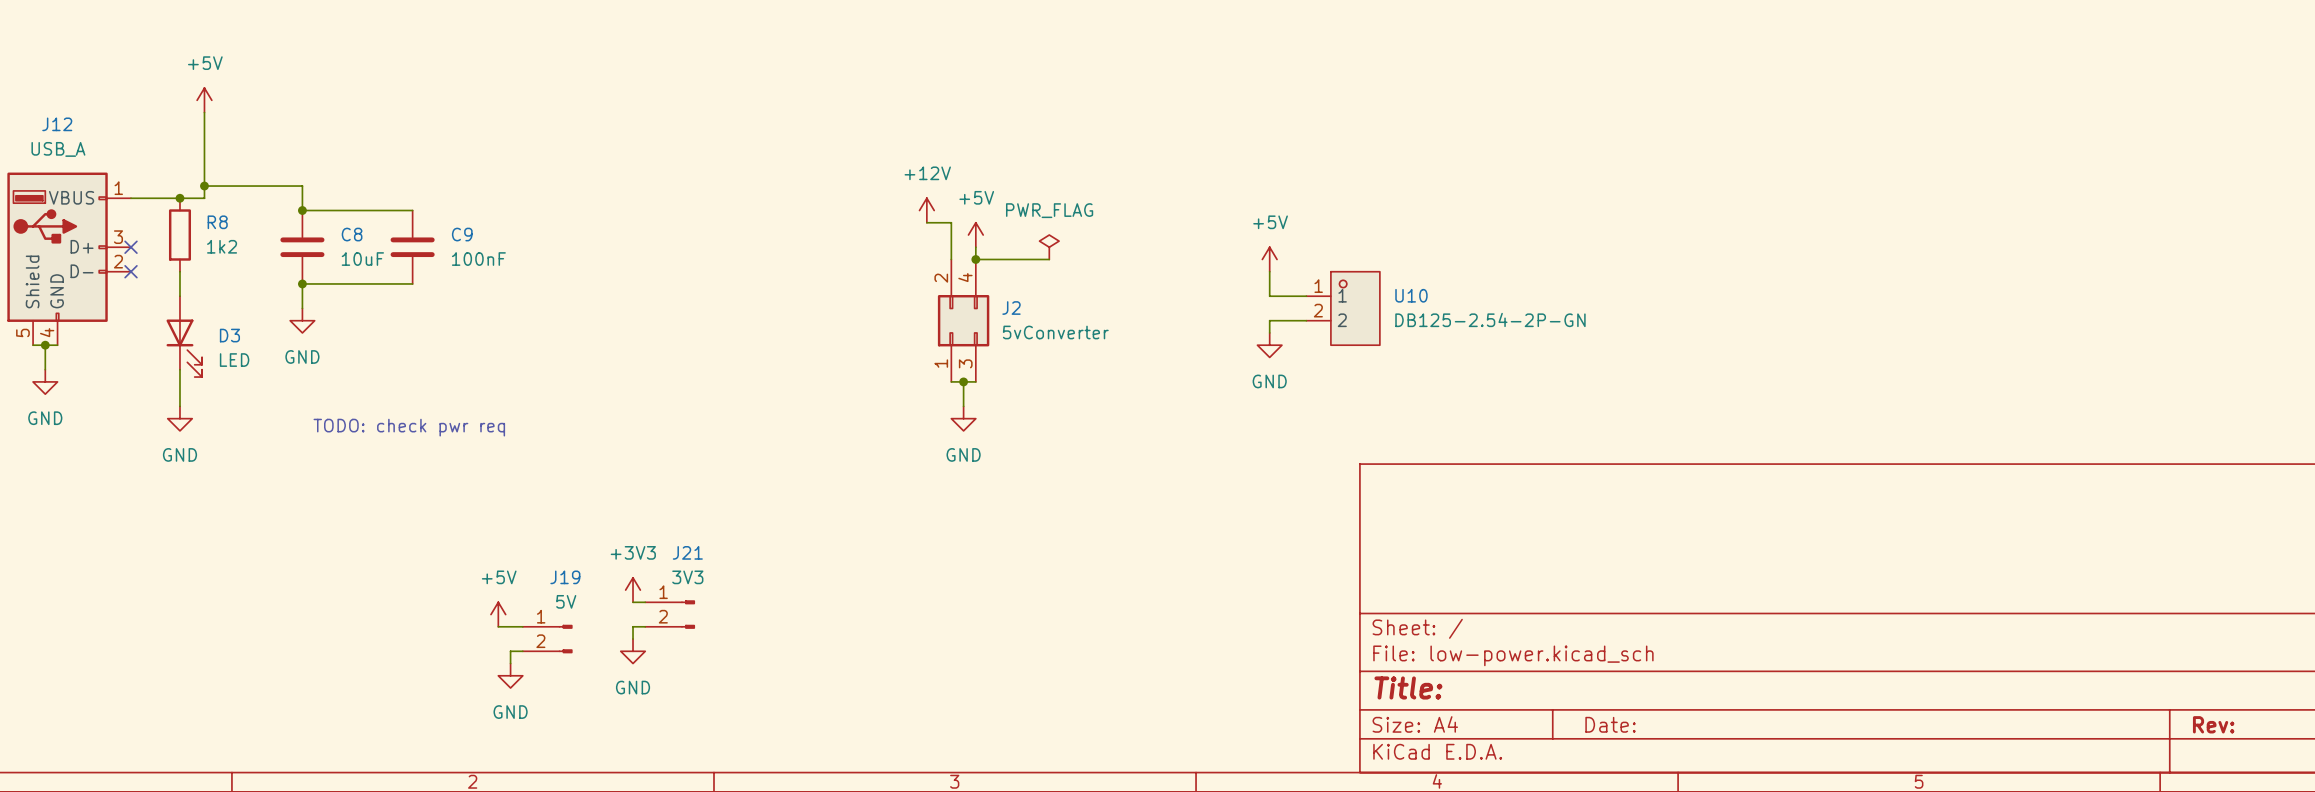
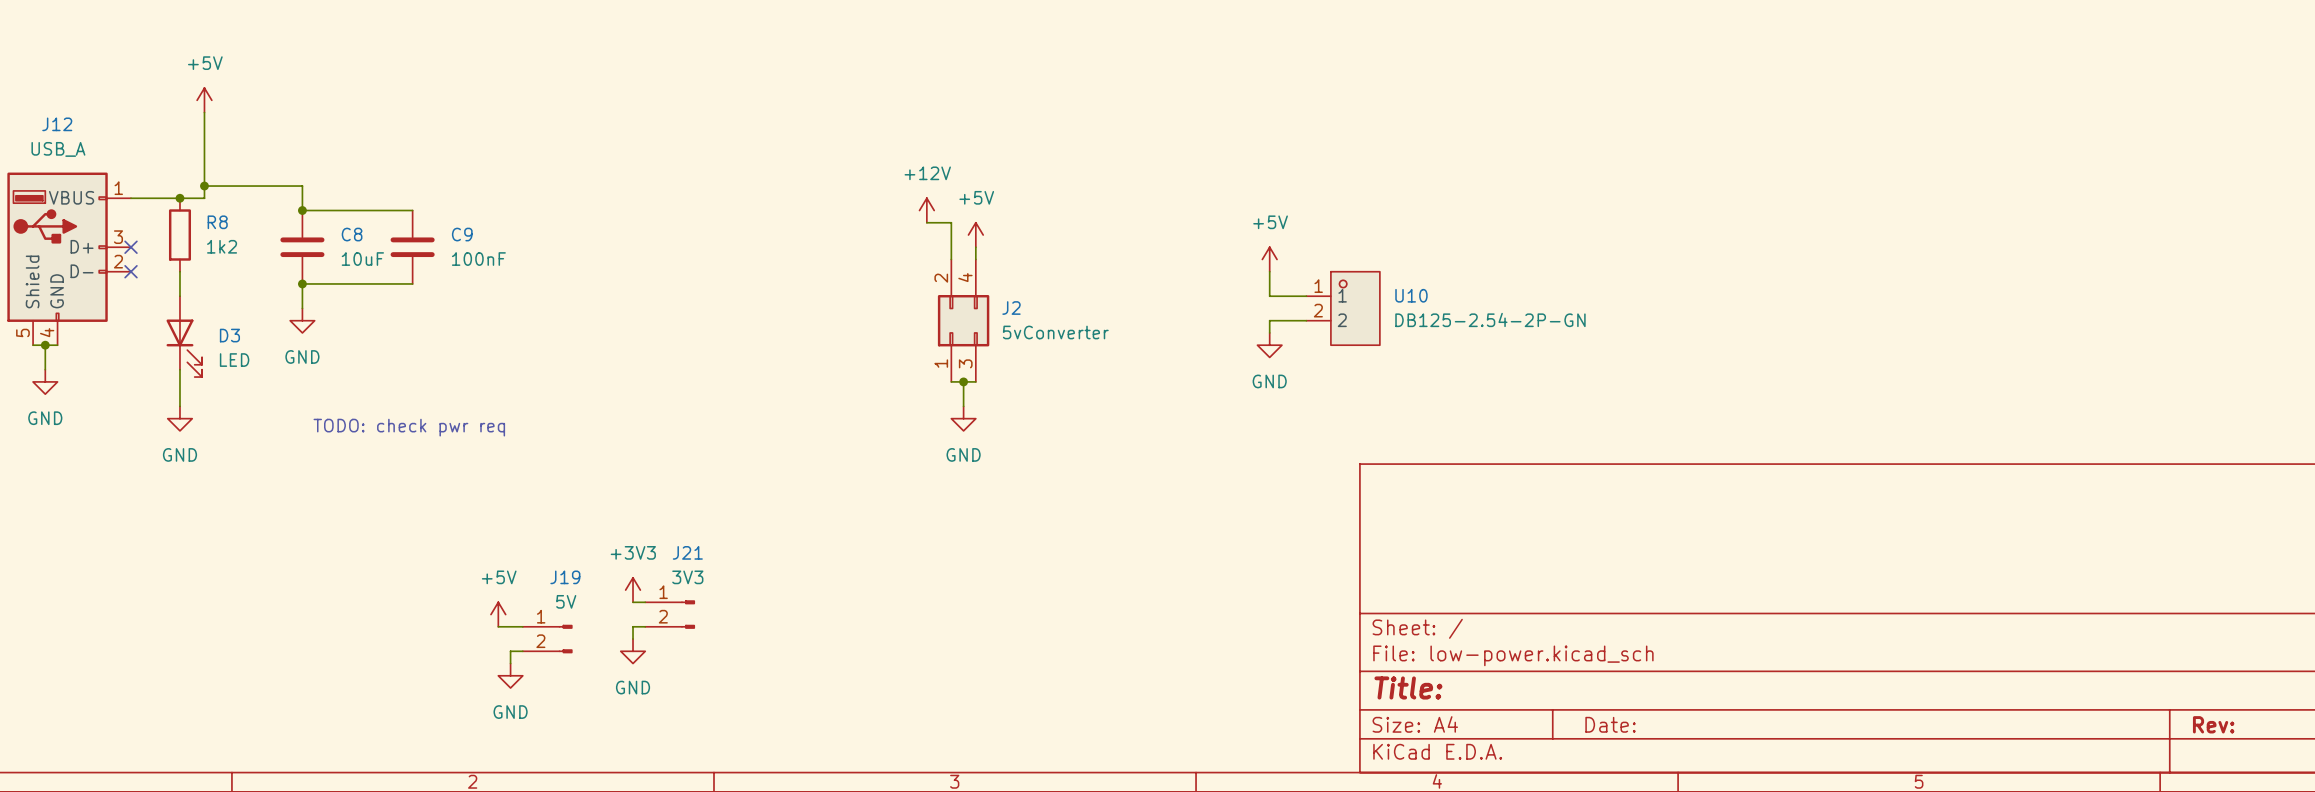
power symbol: PWR_FLAG (1049, 247) -> none
wire: (975, 259) (1049, 259) -> none
junction: (975, 259) -> none

